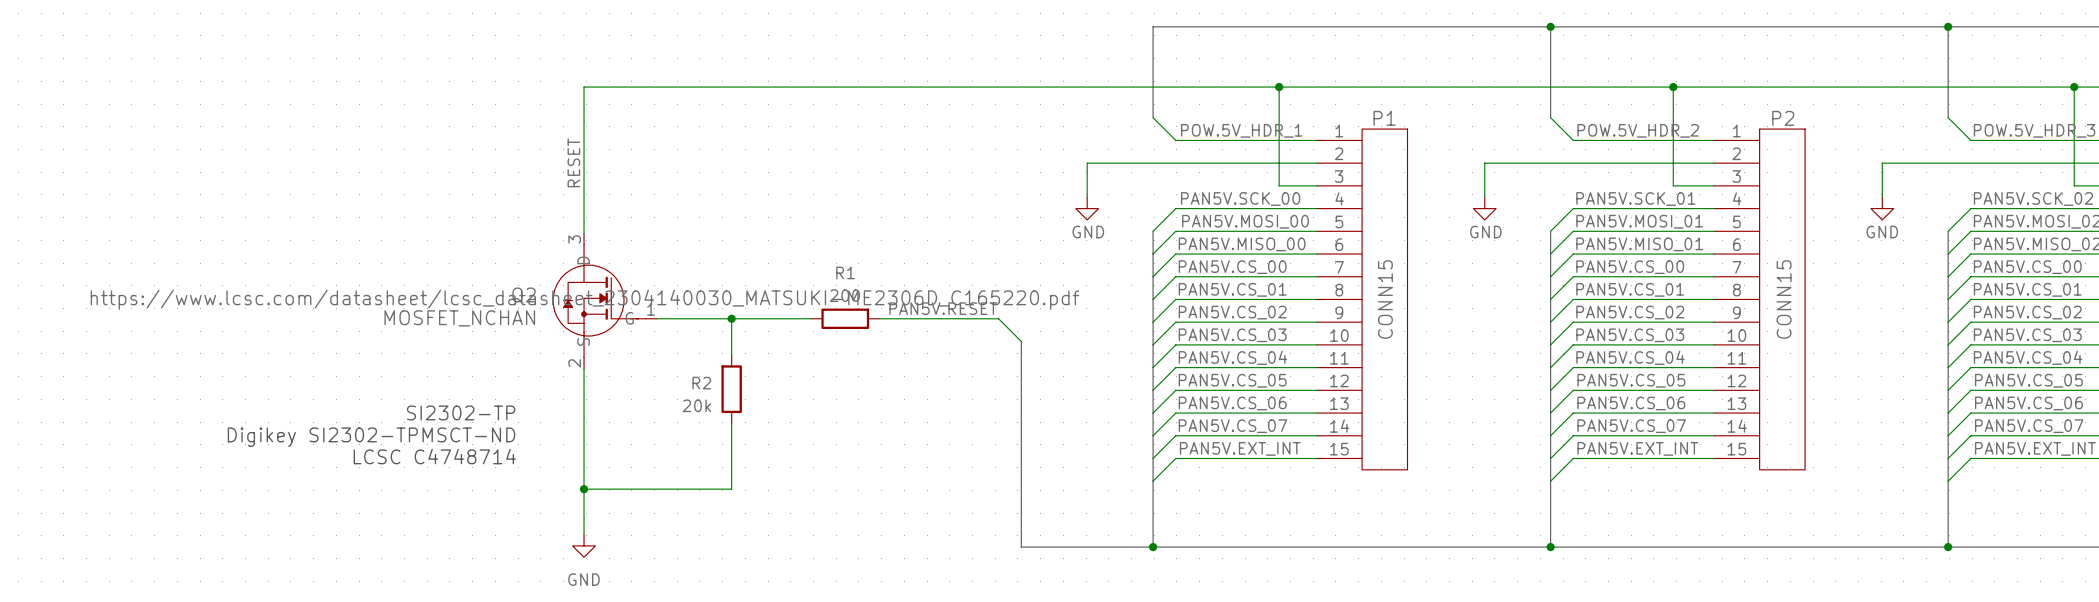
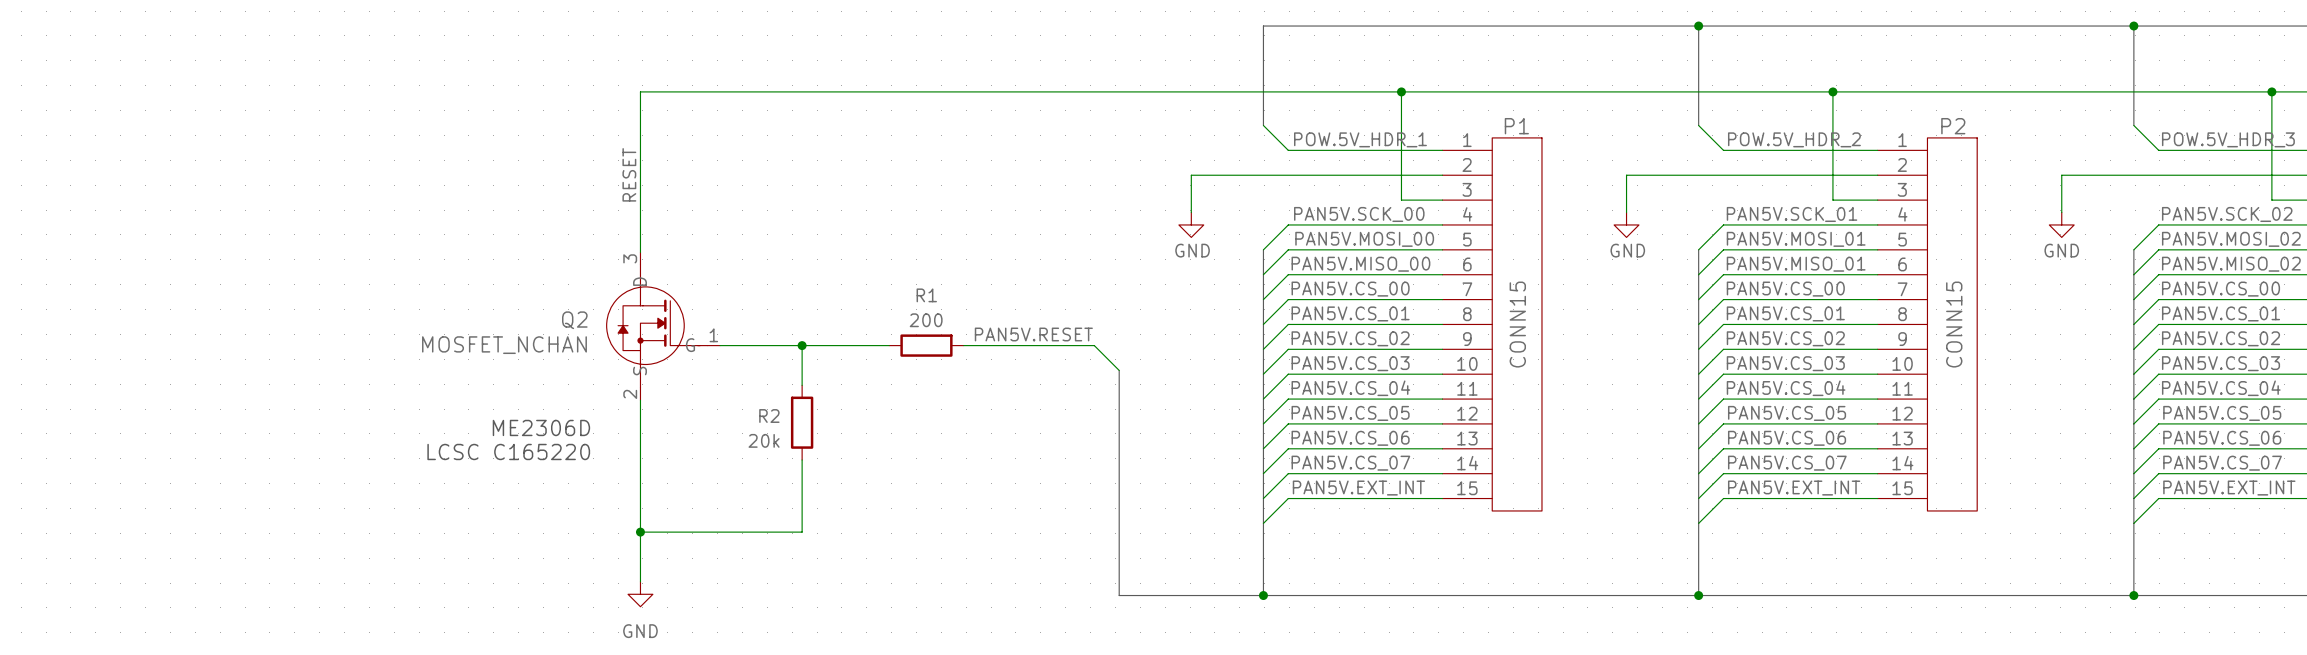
Q2 text: https://www.lcsc.com/datasheet/lcsc_datasheet_2304140030_MATSUKI-ME2306D_C165220.pdf (584, 299) -> none
text: none -> ME2306D (541, 427)
text: SI2302-TP (461, 412) -> none
text: none -> LCSC C165220 (508, 451)
text: Digikey SI2302-TPMSCT-ND (371, 437) -> none
text: LCSC C4748714 (434, 456) -> none

